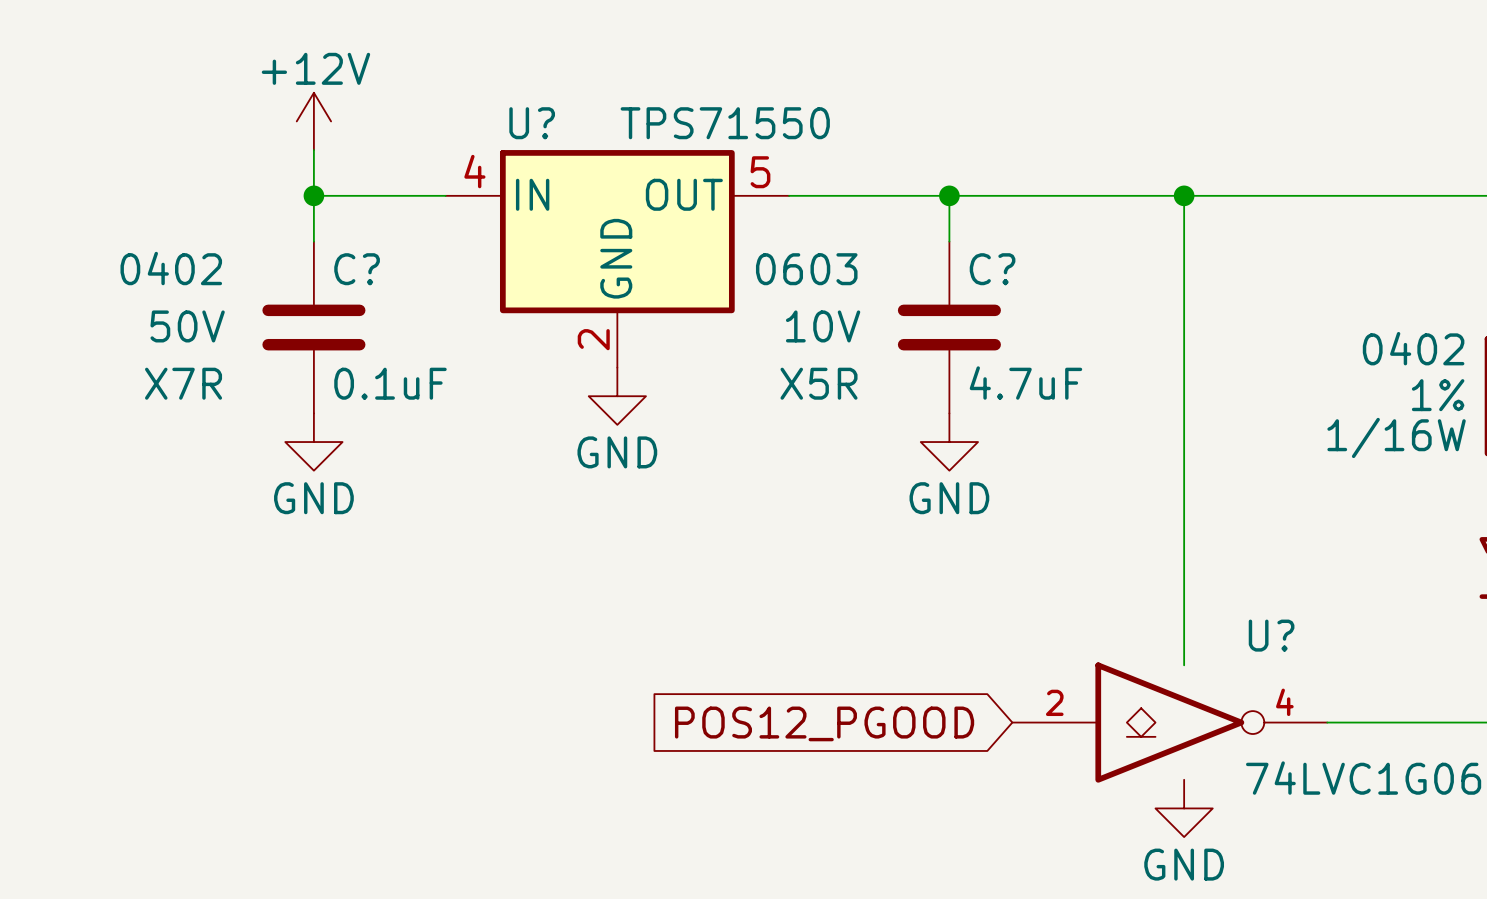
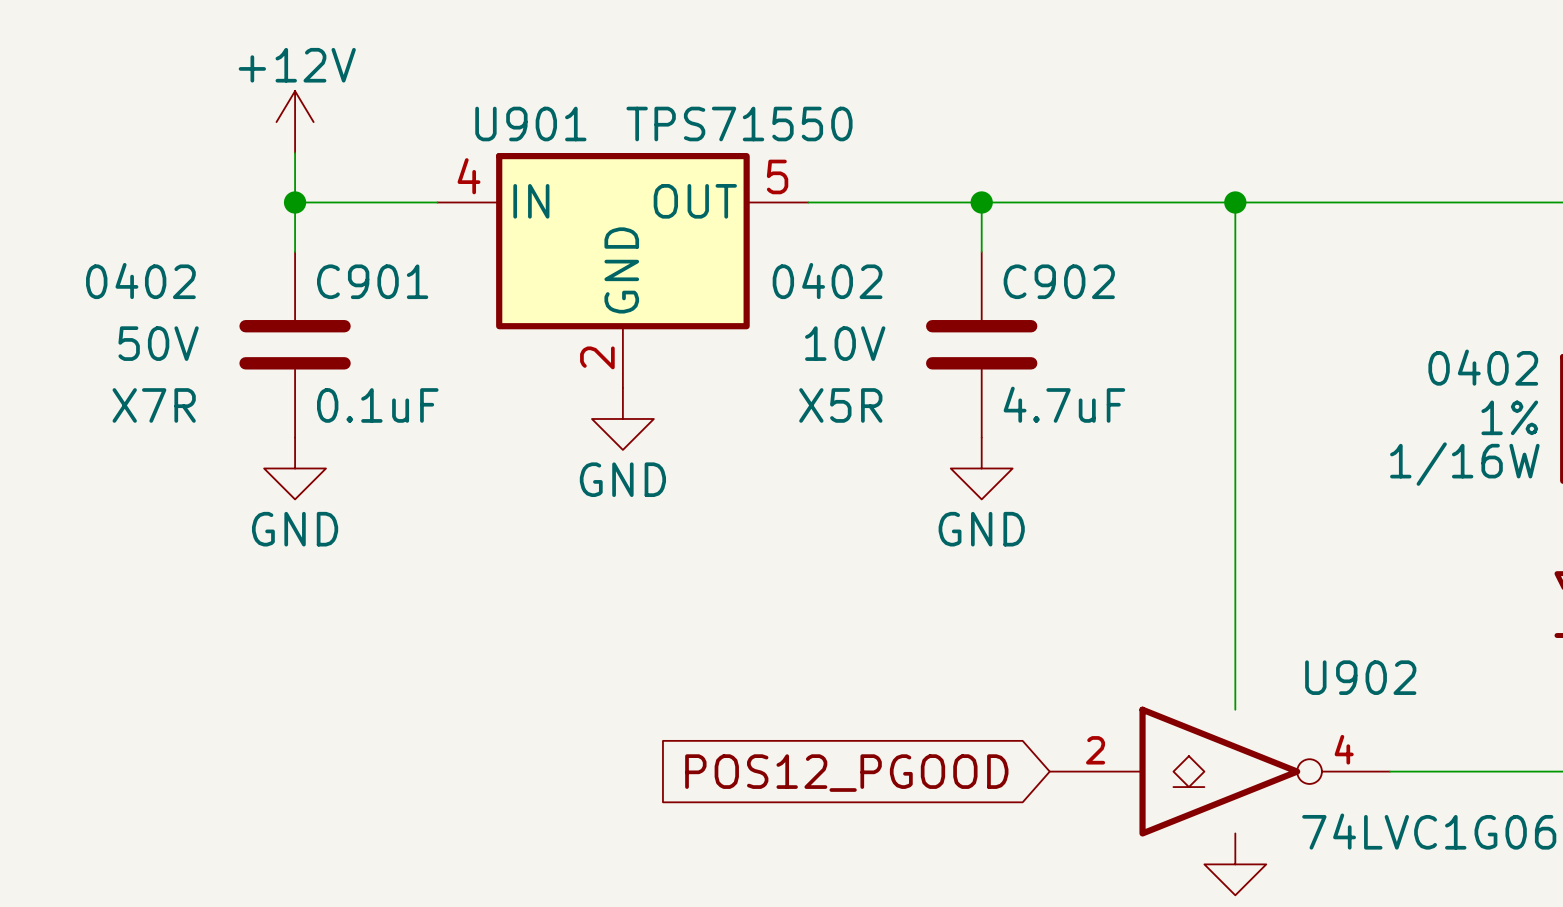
U? name: U? (532, 123) -> U901 (530, 124)
C? name: C? (357, 269) -> C901 (372, 281)
C? text: 0603 (806, 269) -> 0402 (827, 281)
C? name: C? (992, 269) -> C902 (1059, 281)
U? name: U? (1271, 635) -> U902 (1360, 677)

